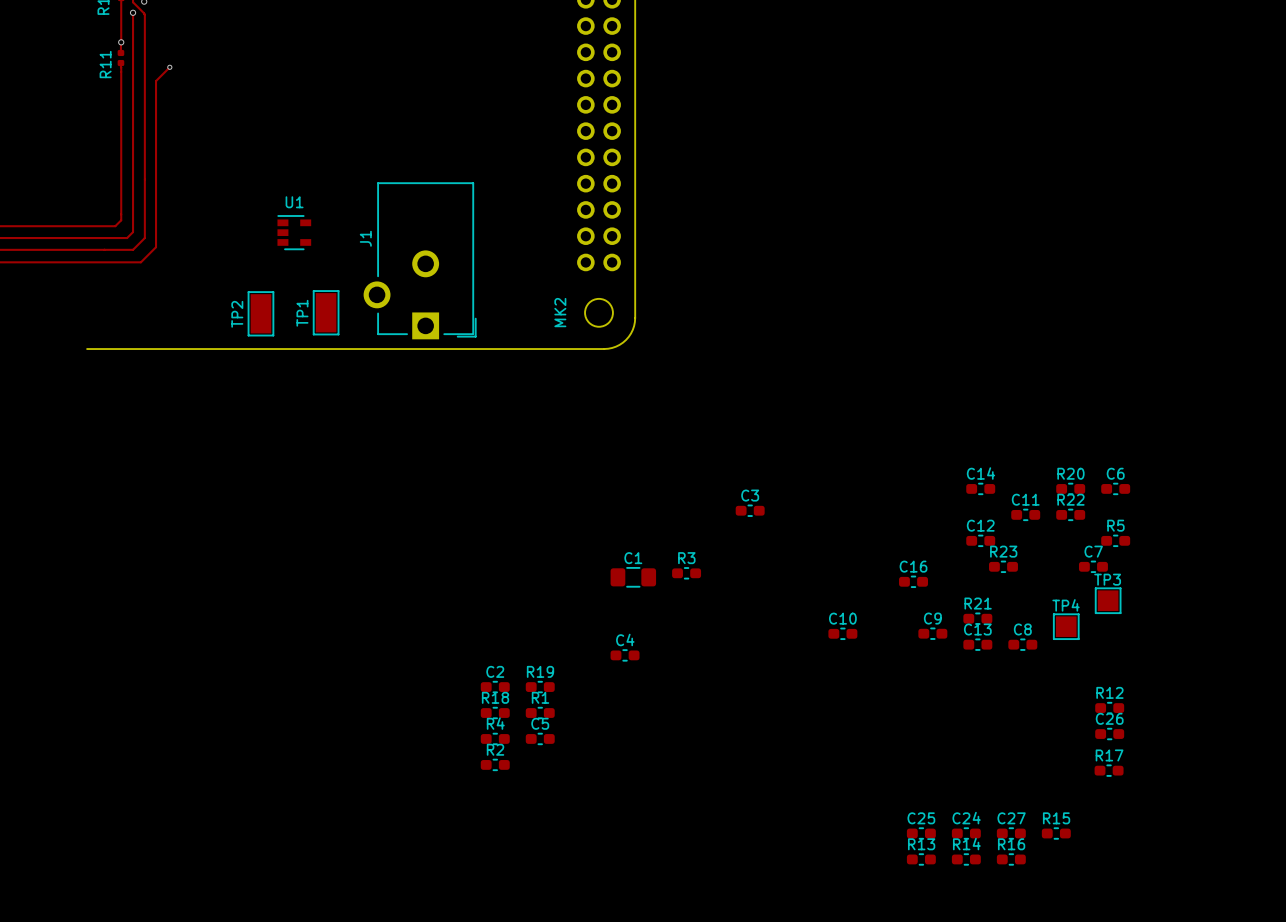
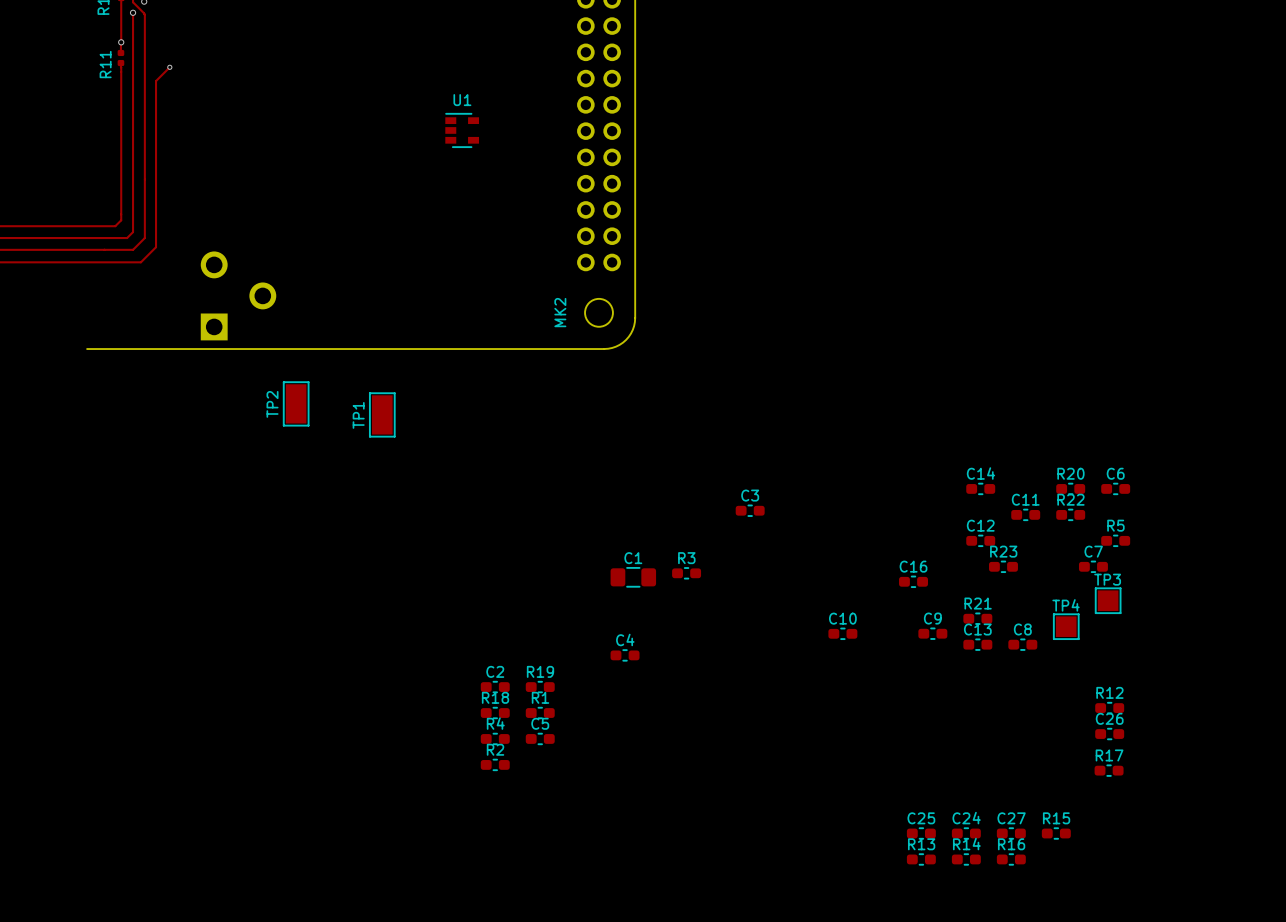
U1 position: (294, 232) -> (462, 130)
J1 side: top (419, 260) -> bottom (238, 295)
TP1 position: (326, 312) -> (382, 414)
TP2 position: (260, 313) -> (296, 403)

